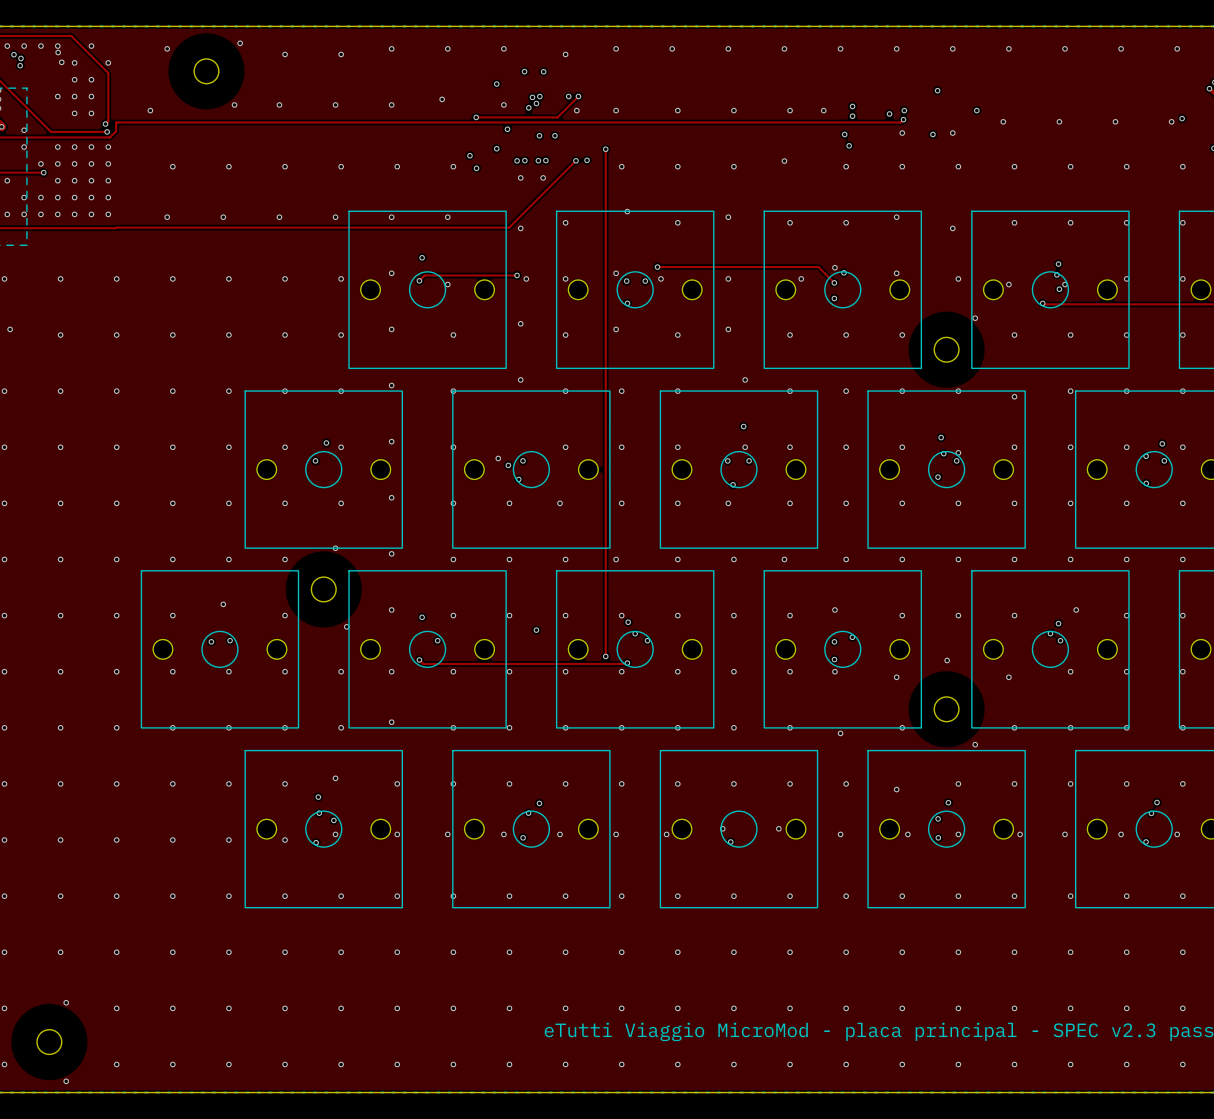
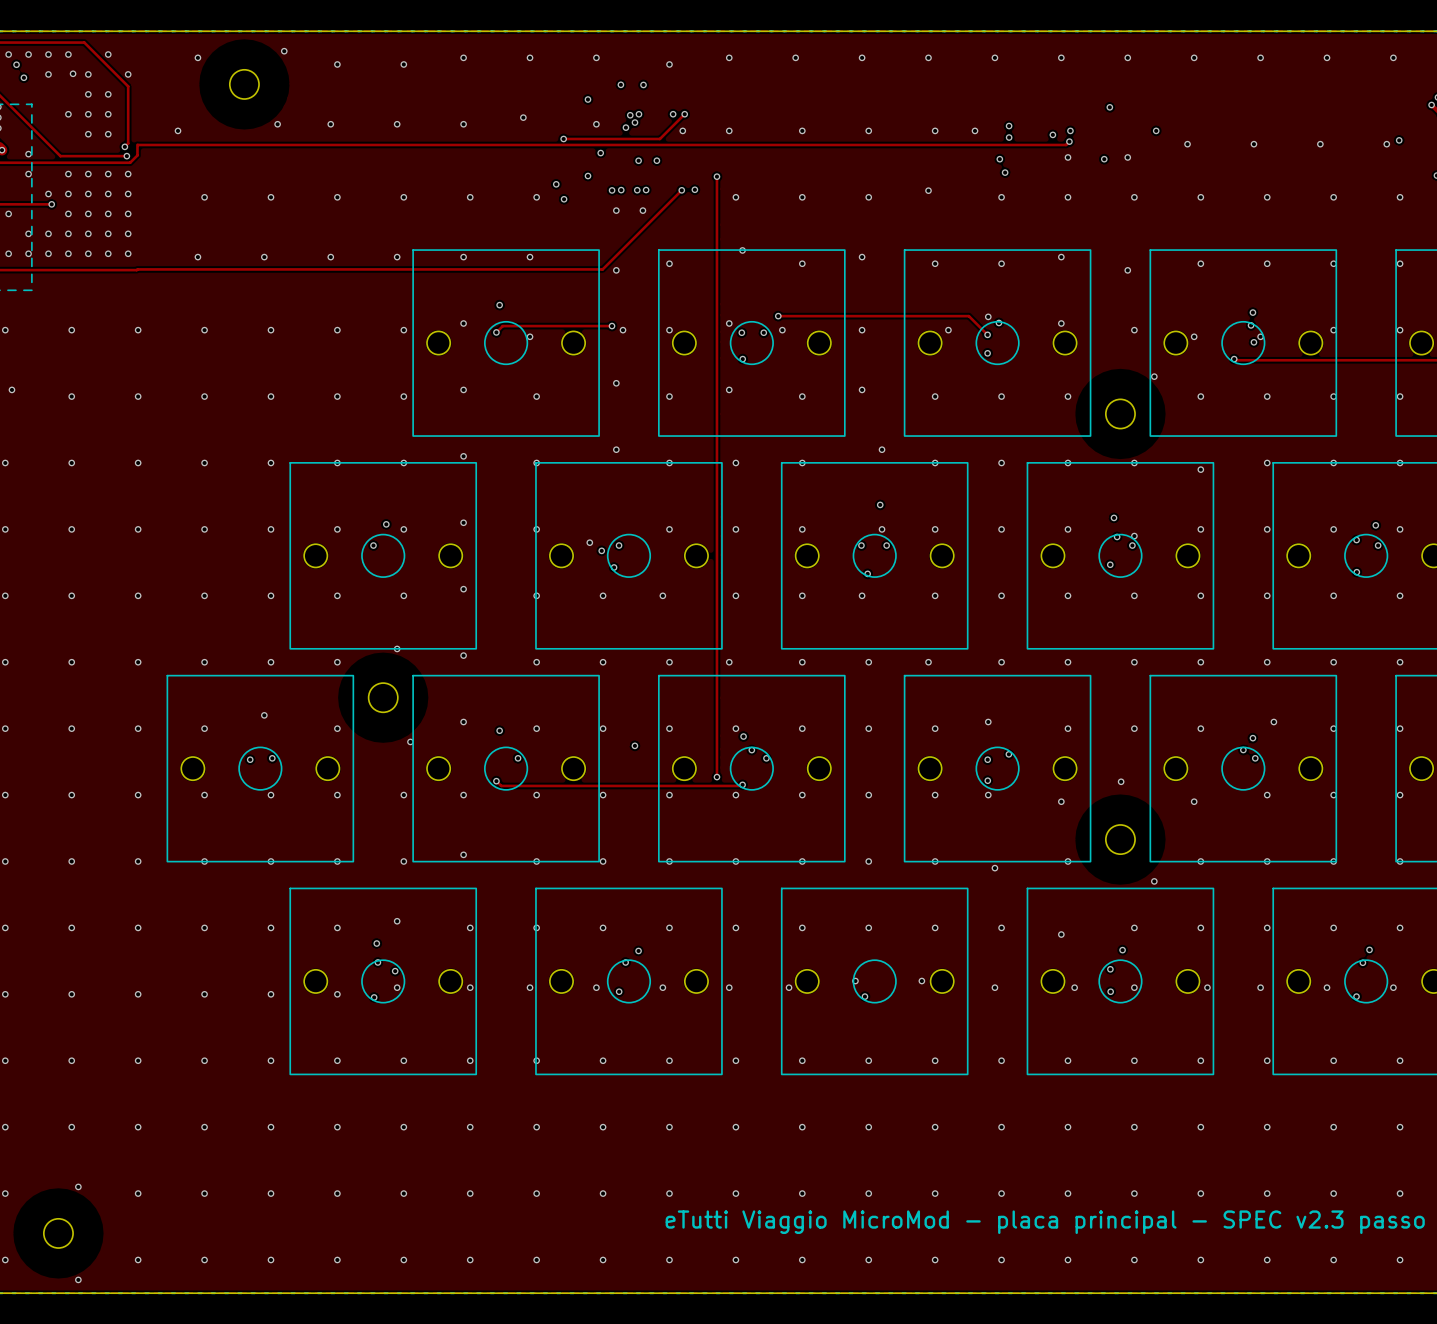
via: (58, 52) -> none
via: (20, 58) -> none
via: none -> (48, 74)

